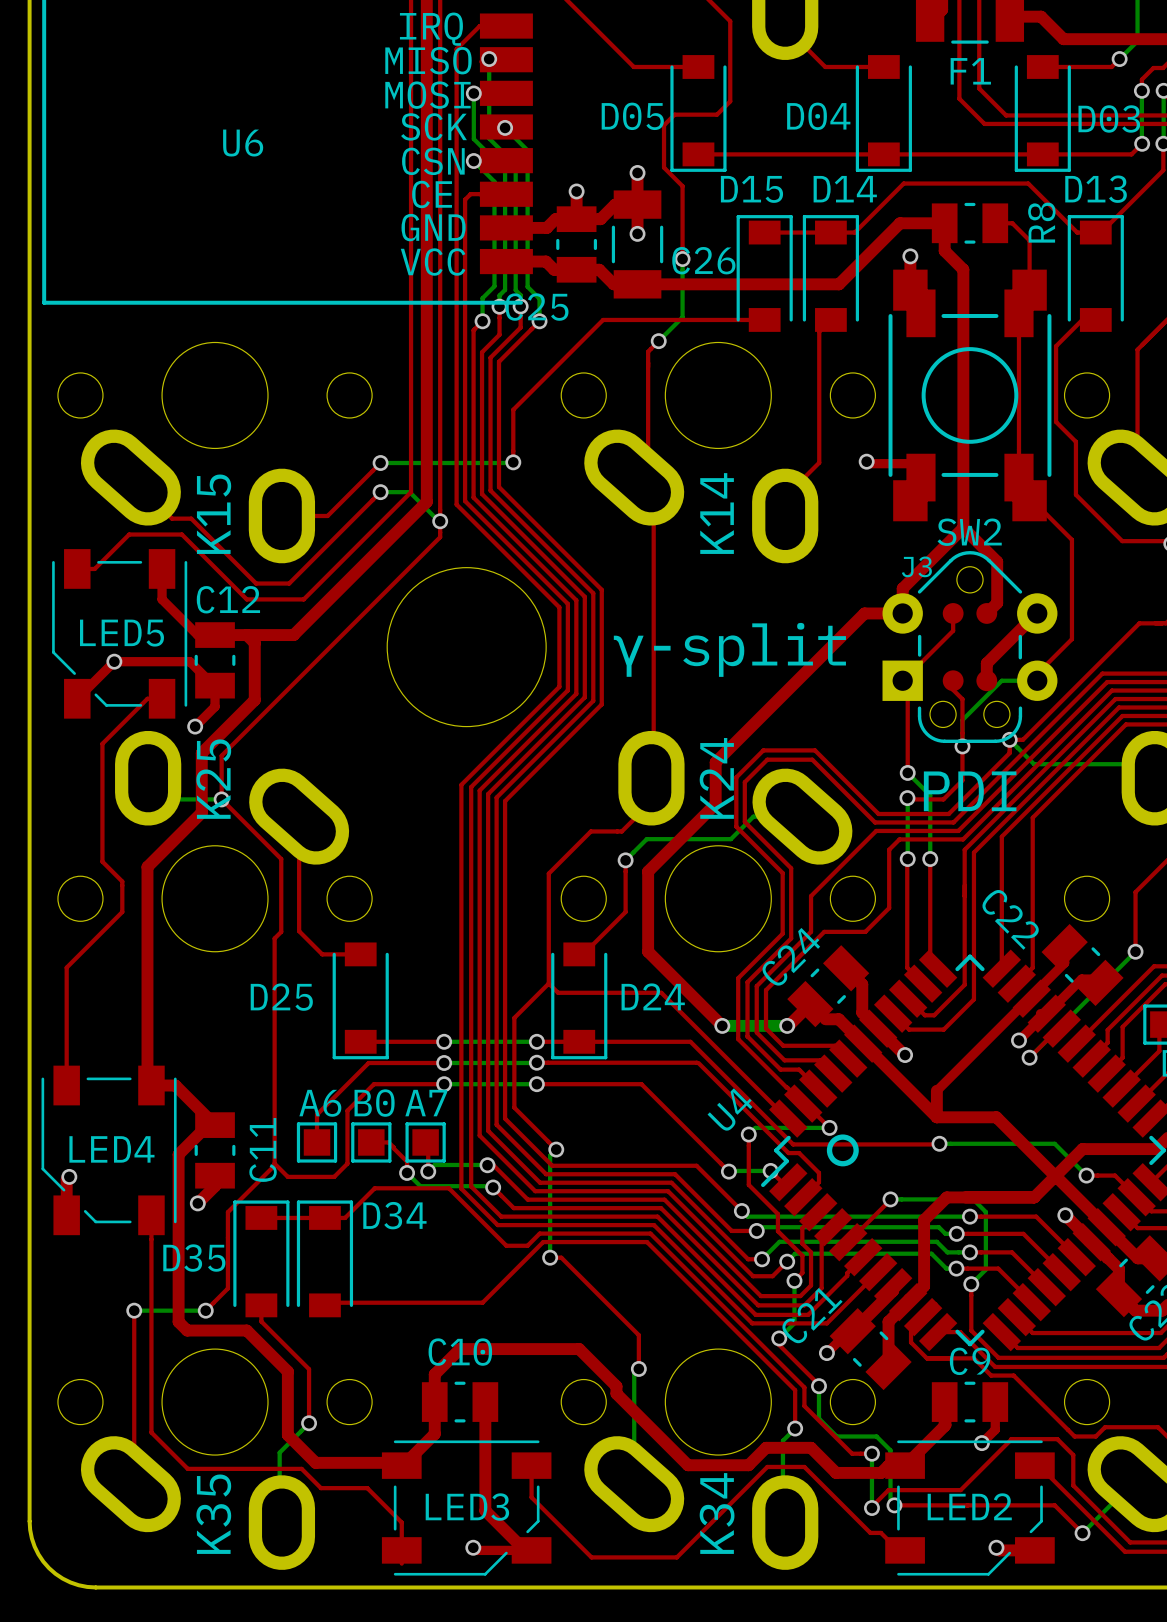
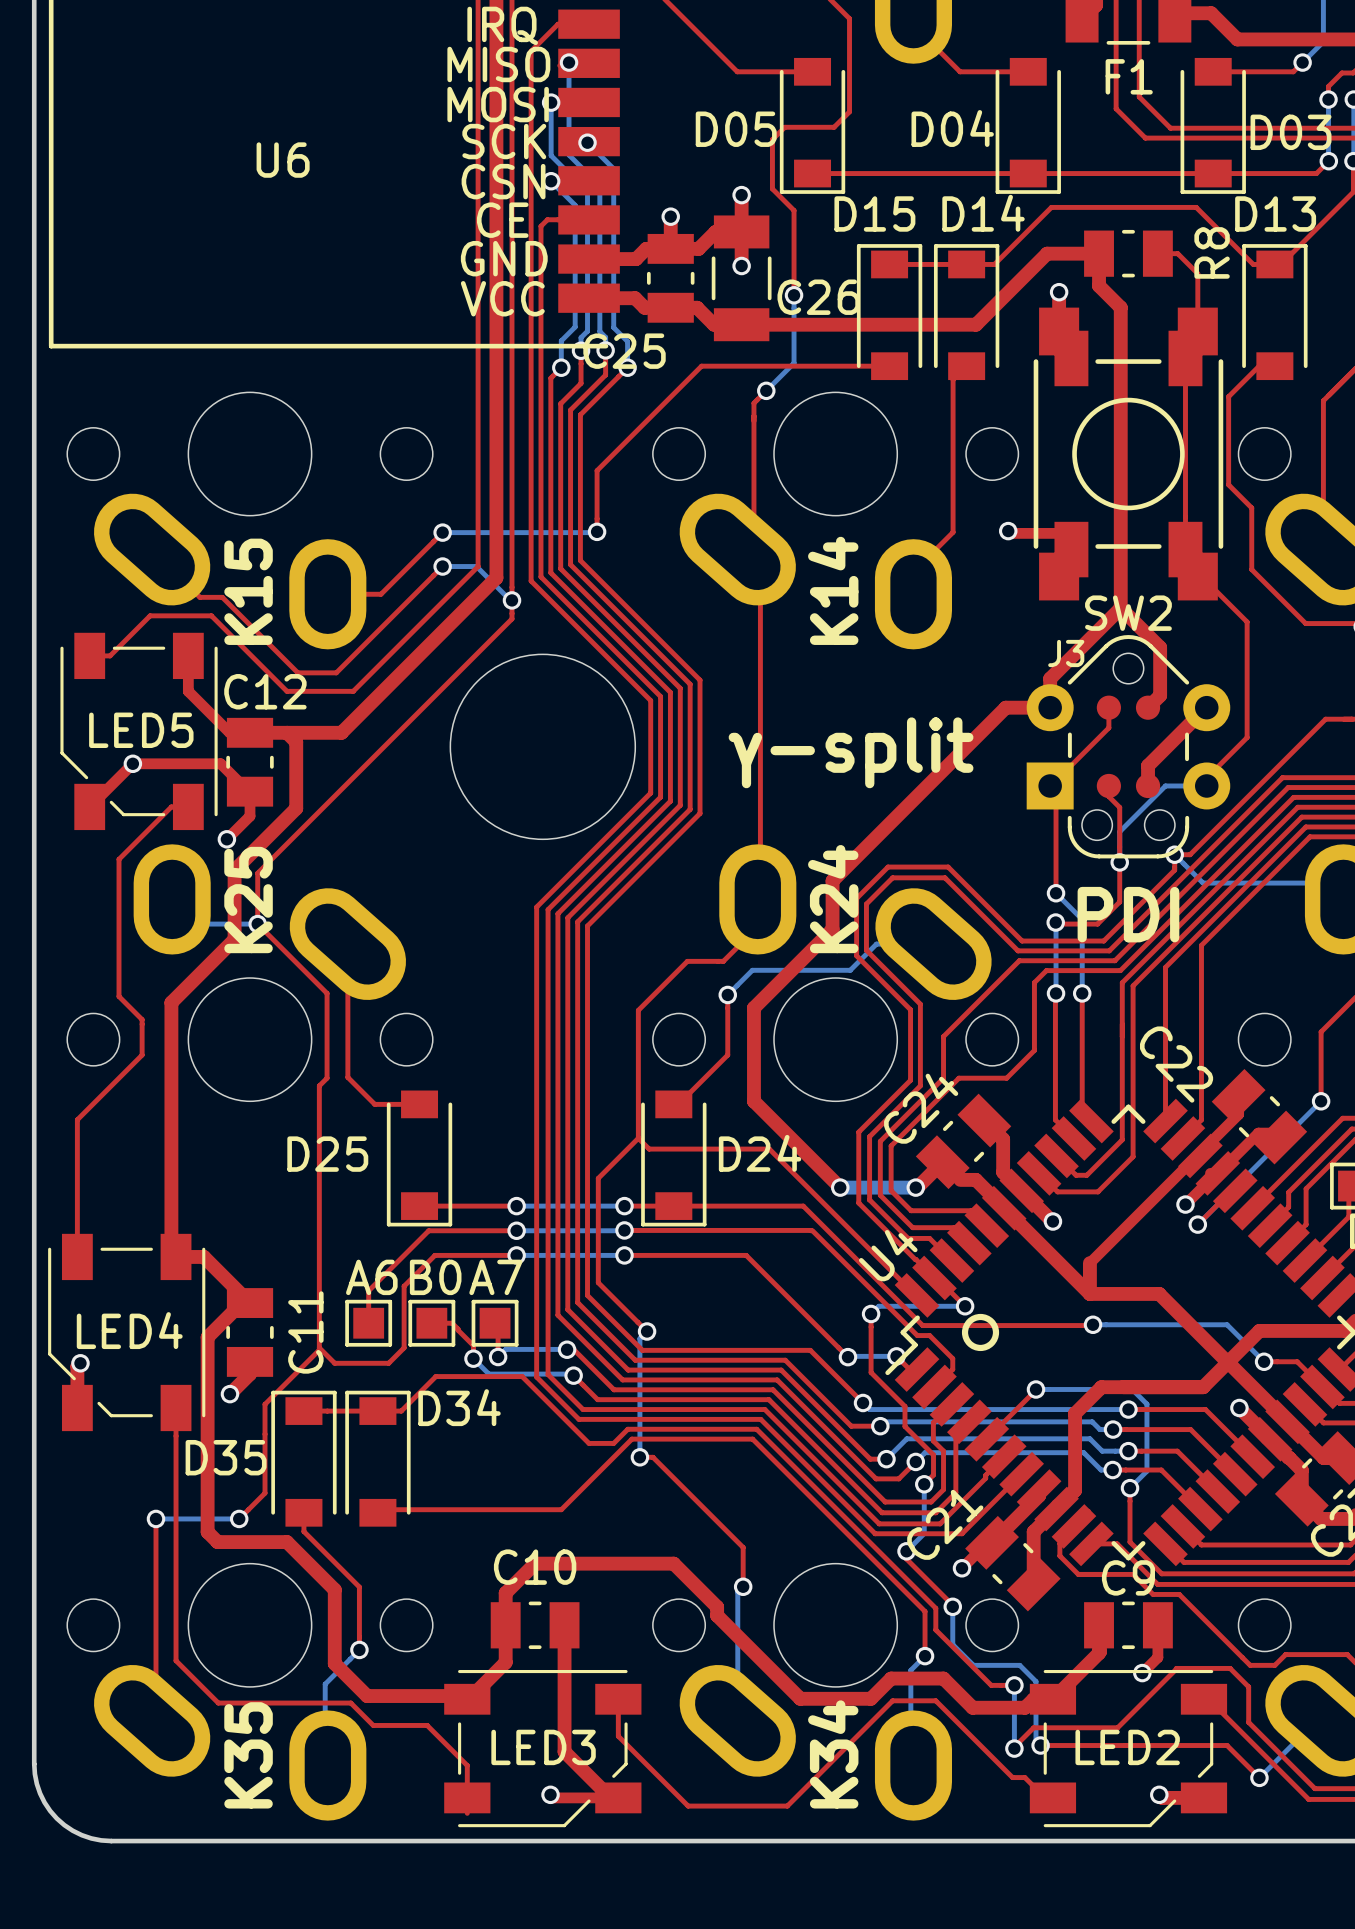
U4 name position: U4 (730, 1109) -> U4 (888, 1255)

